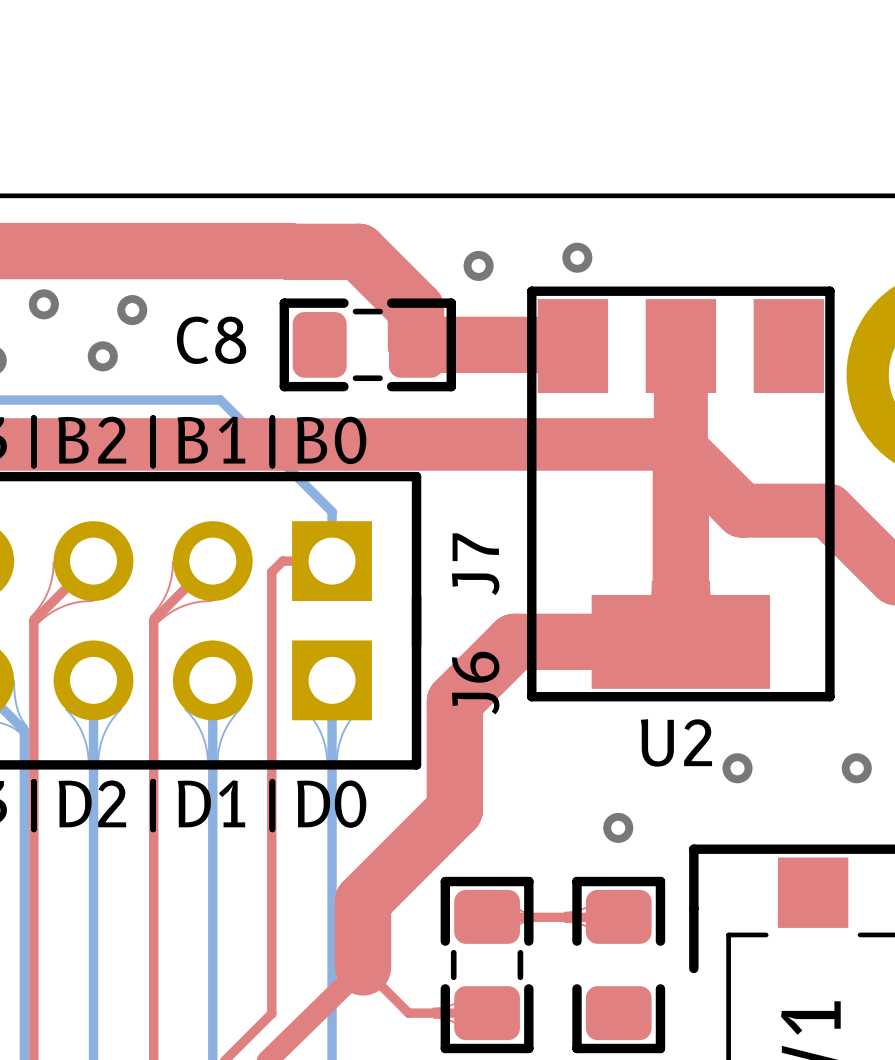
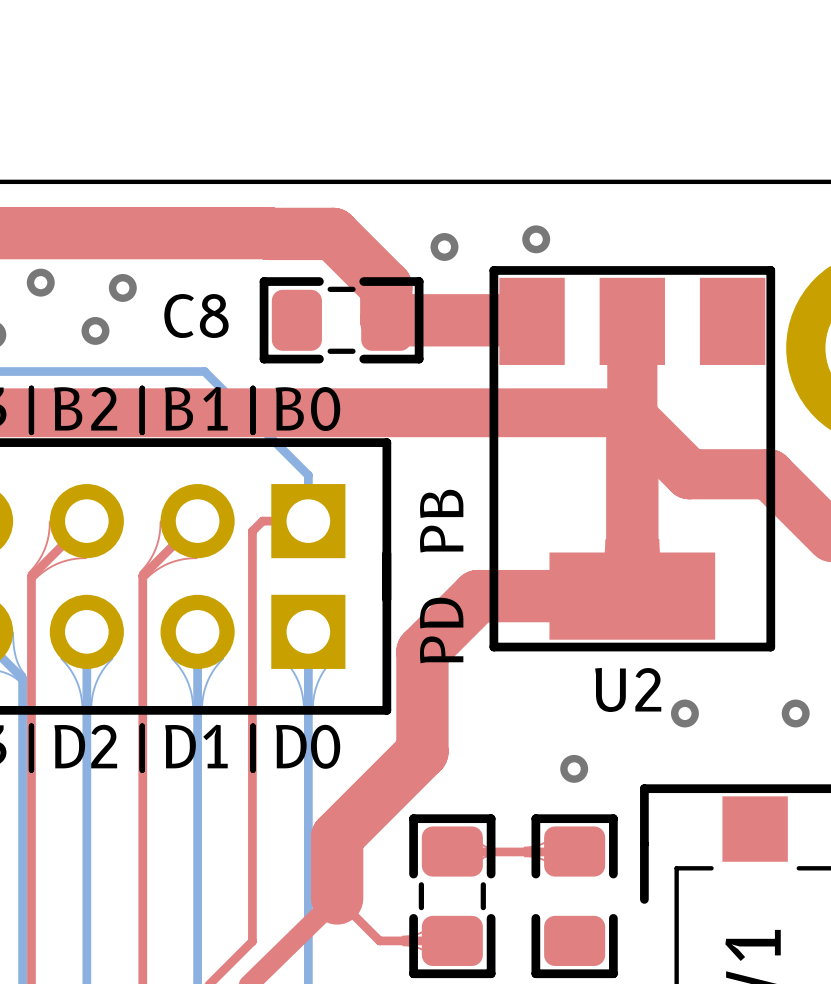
J7 name: J7 (475, 564) -> PB (441, 521)
J6 name: J6 (475, 683) -> PD (441, 630)

